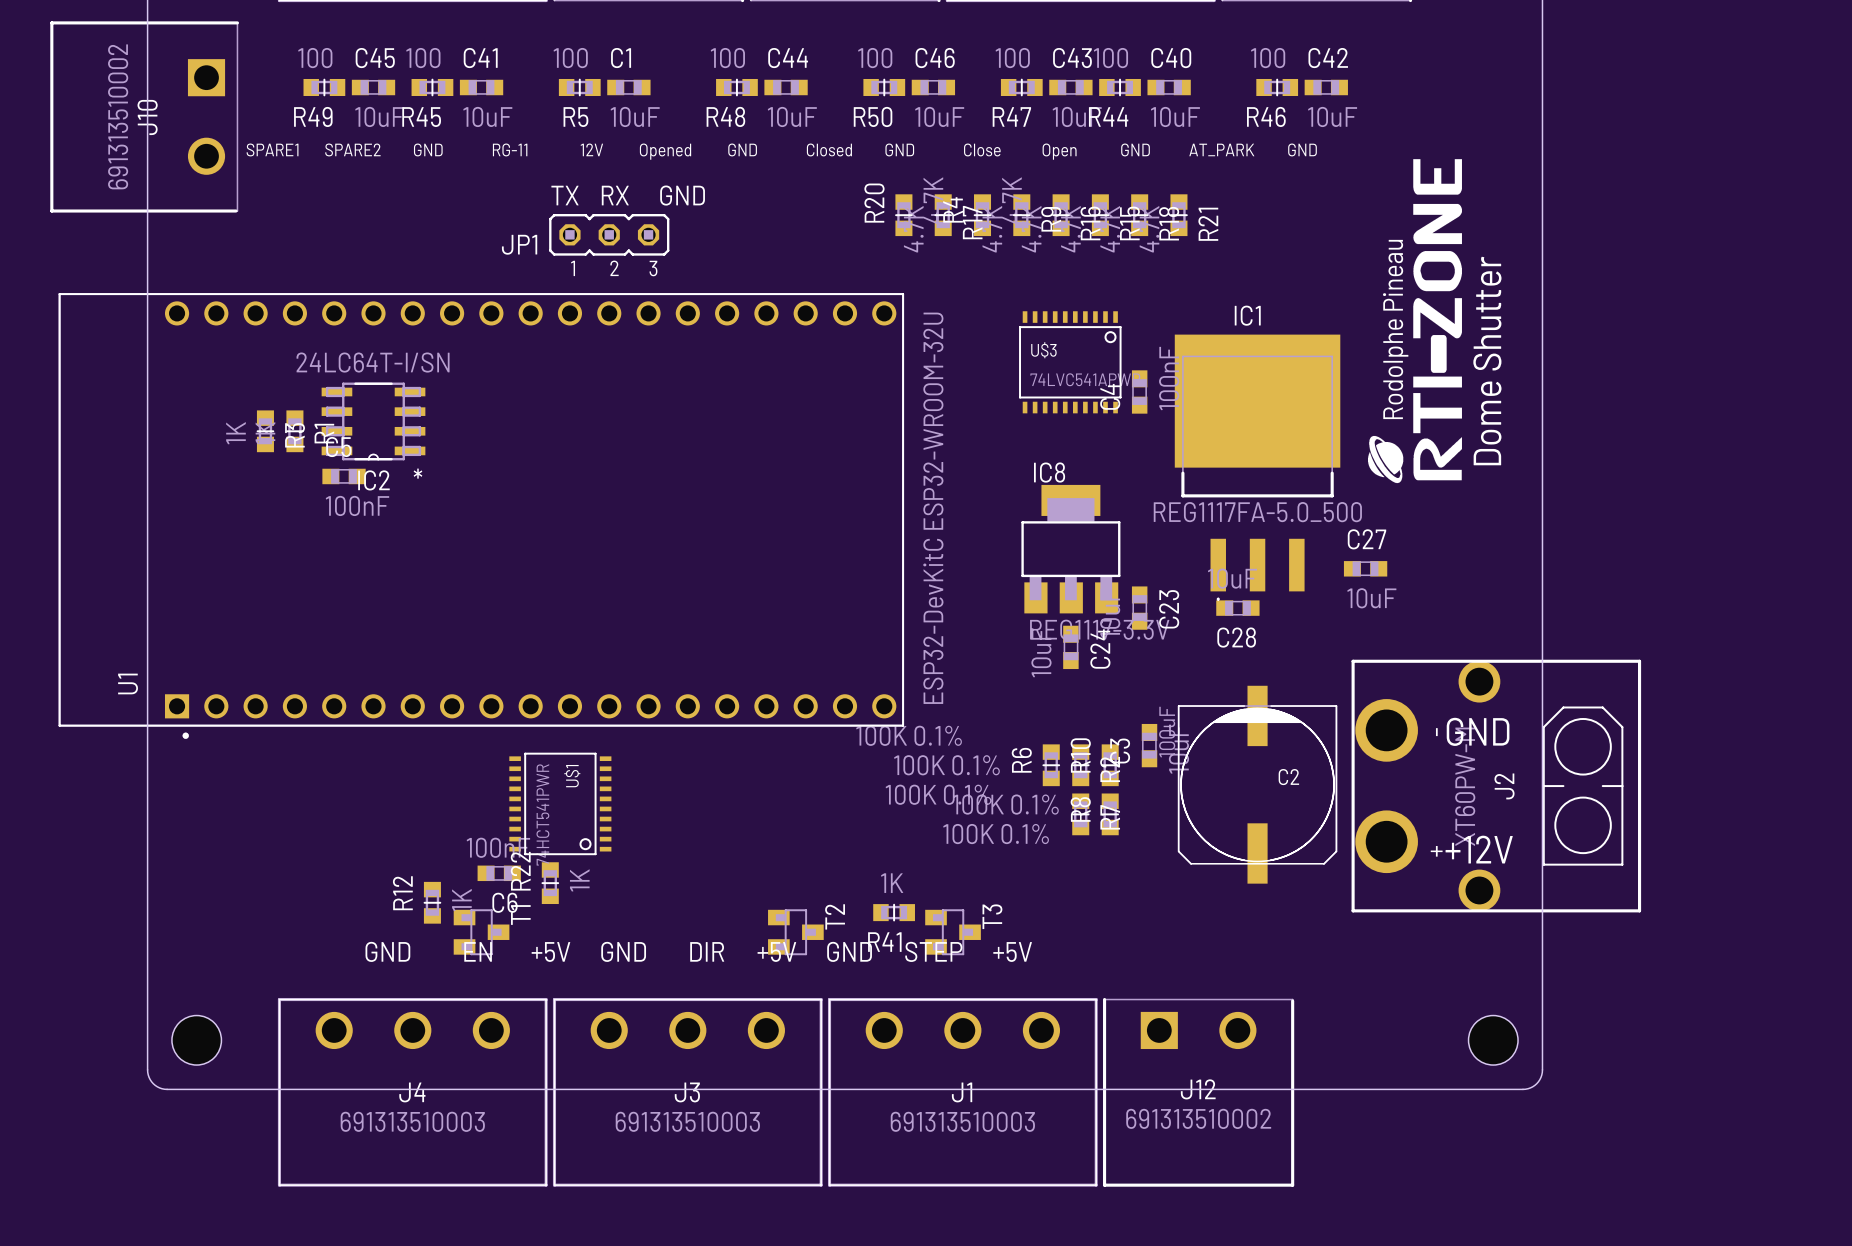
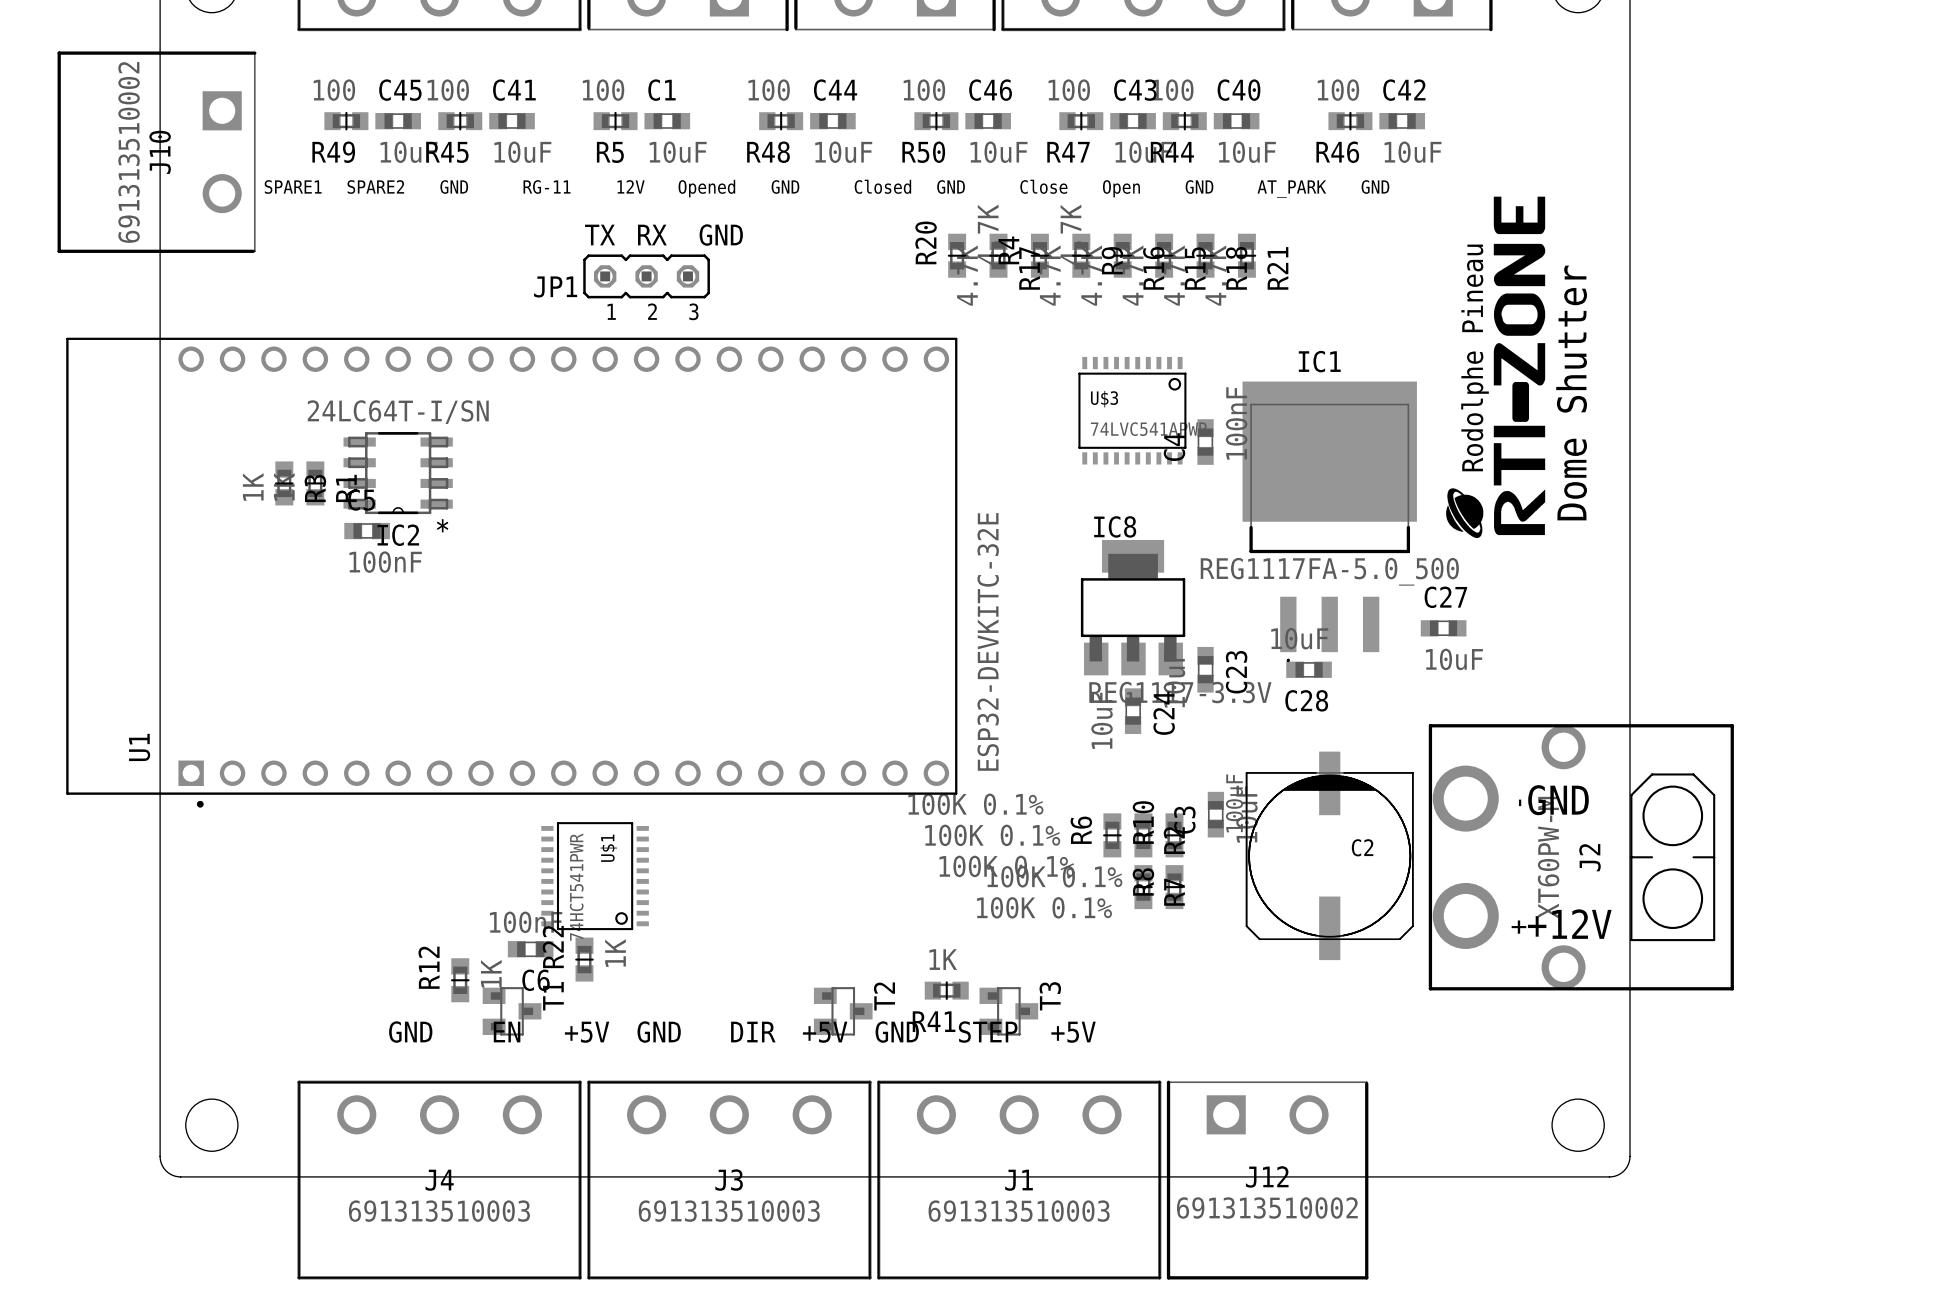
U1 value: ESP32-DevKitC ESP32-WROOM-32U (933, 508) -> ESP32-DEVKITC-32E (988, 641)

